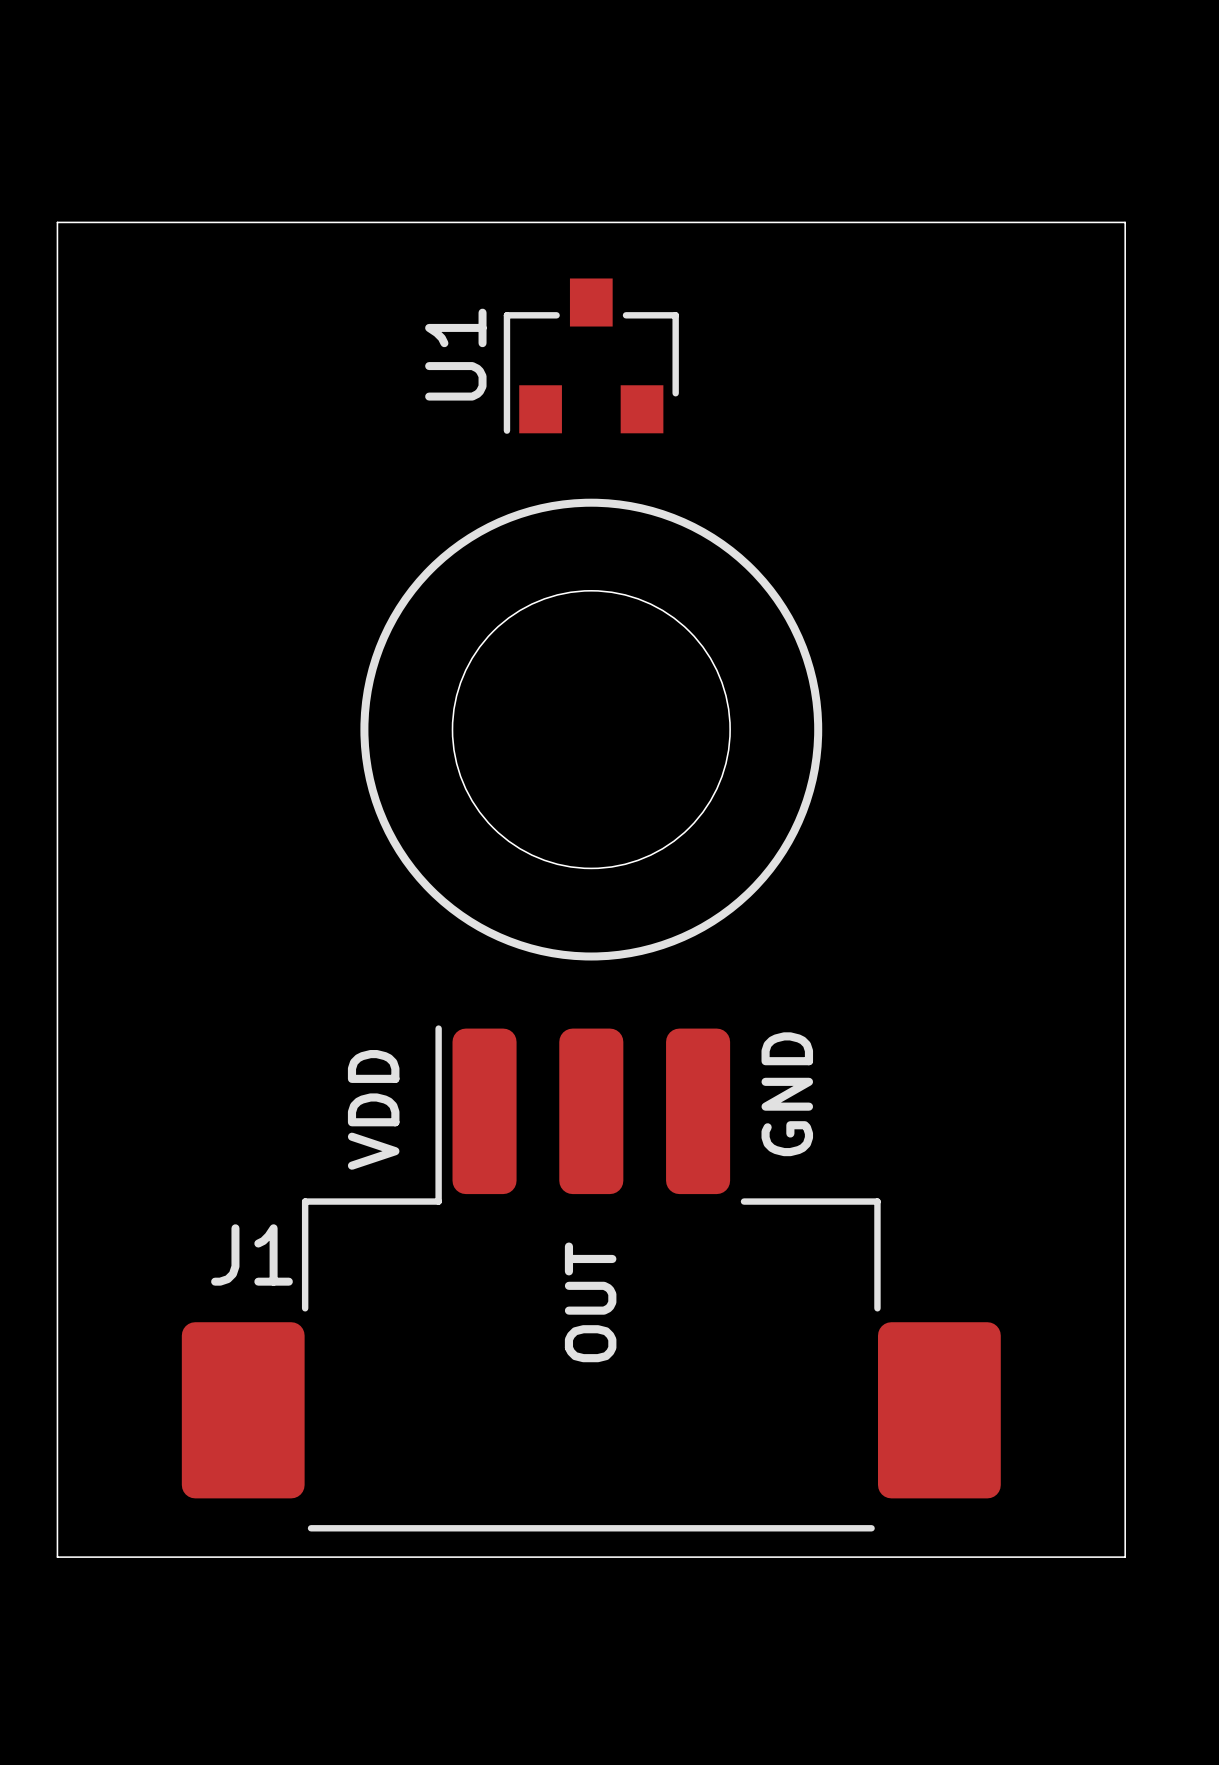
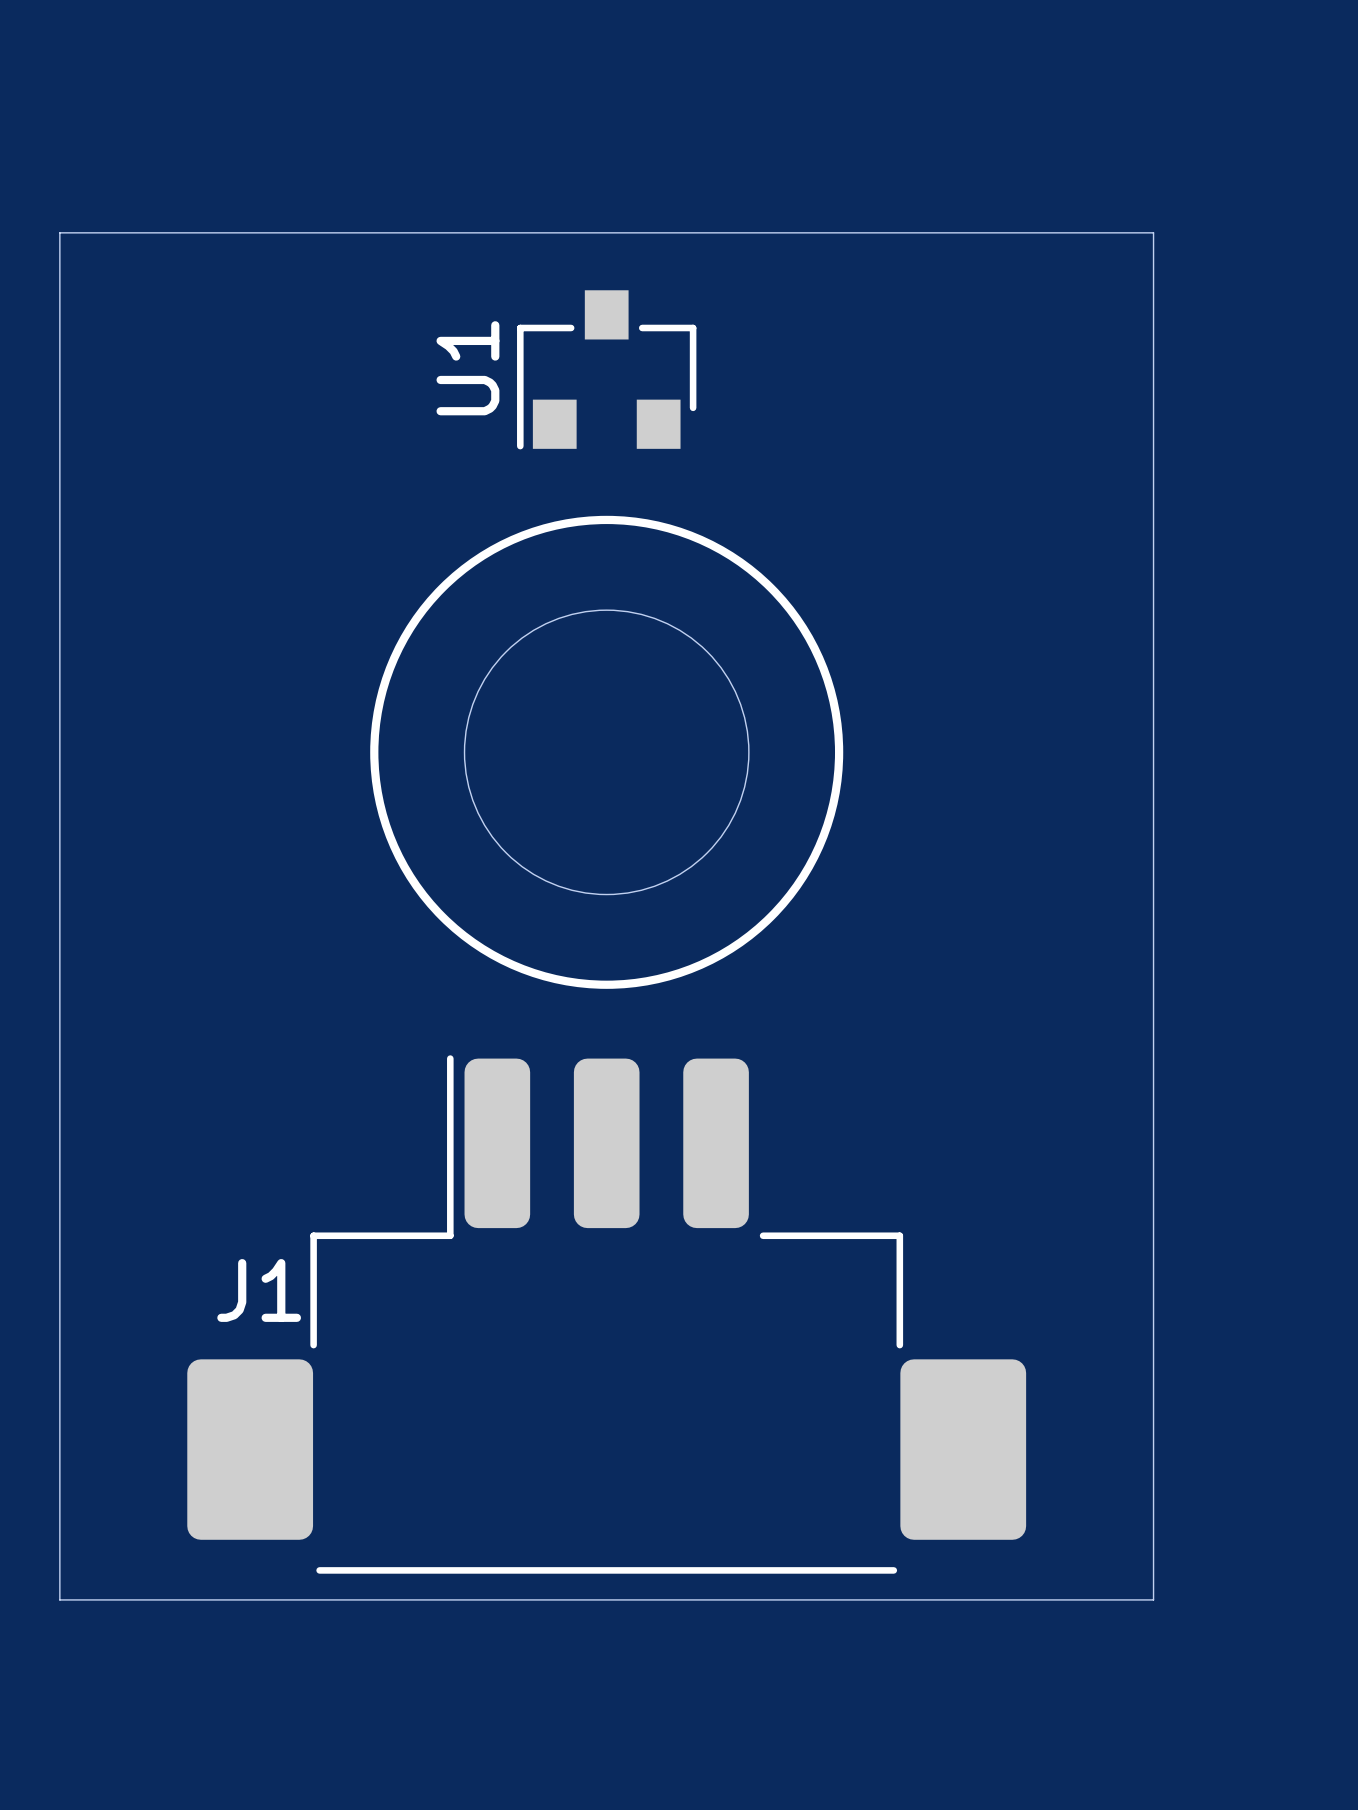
text: GND (787, 1094) -> none
text: VDD (373, 1109) -> none
text: OUT (590, 1302) -> none

